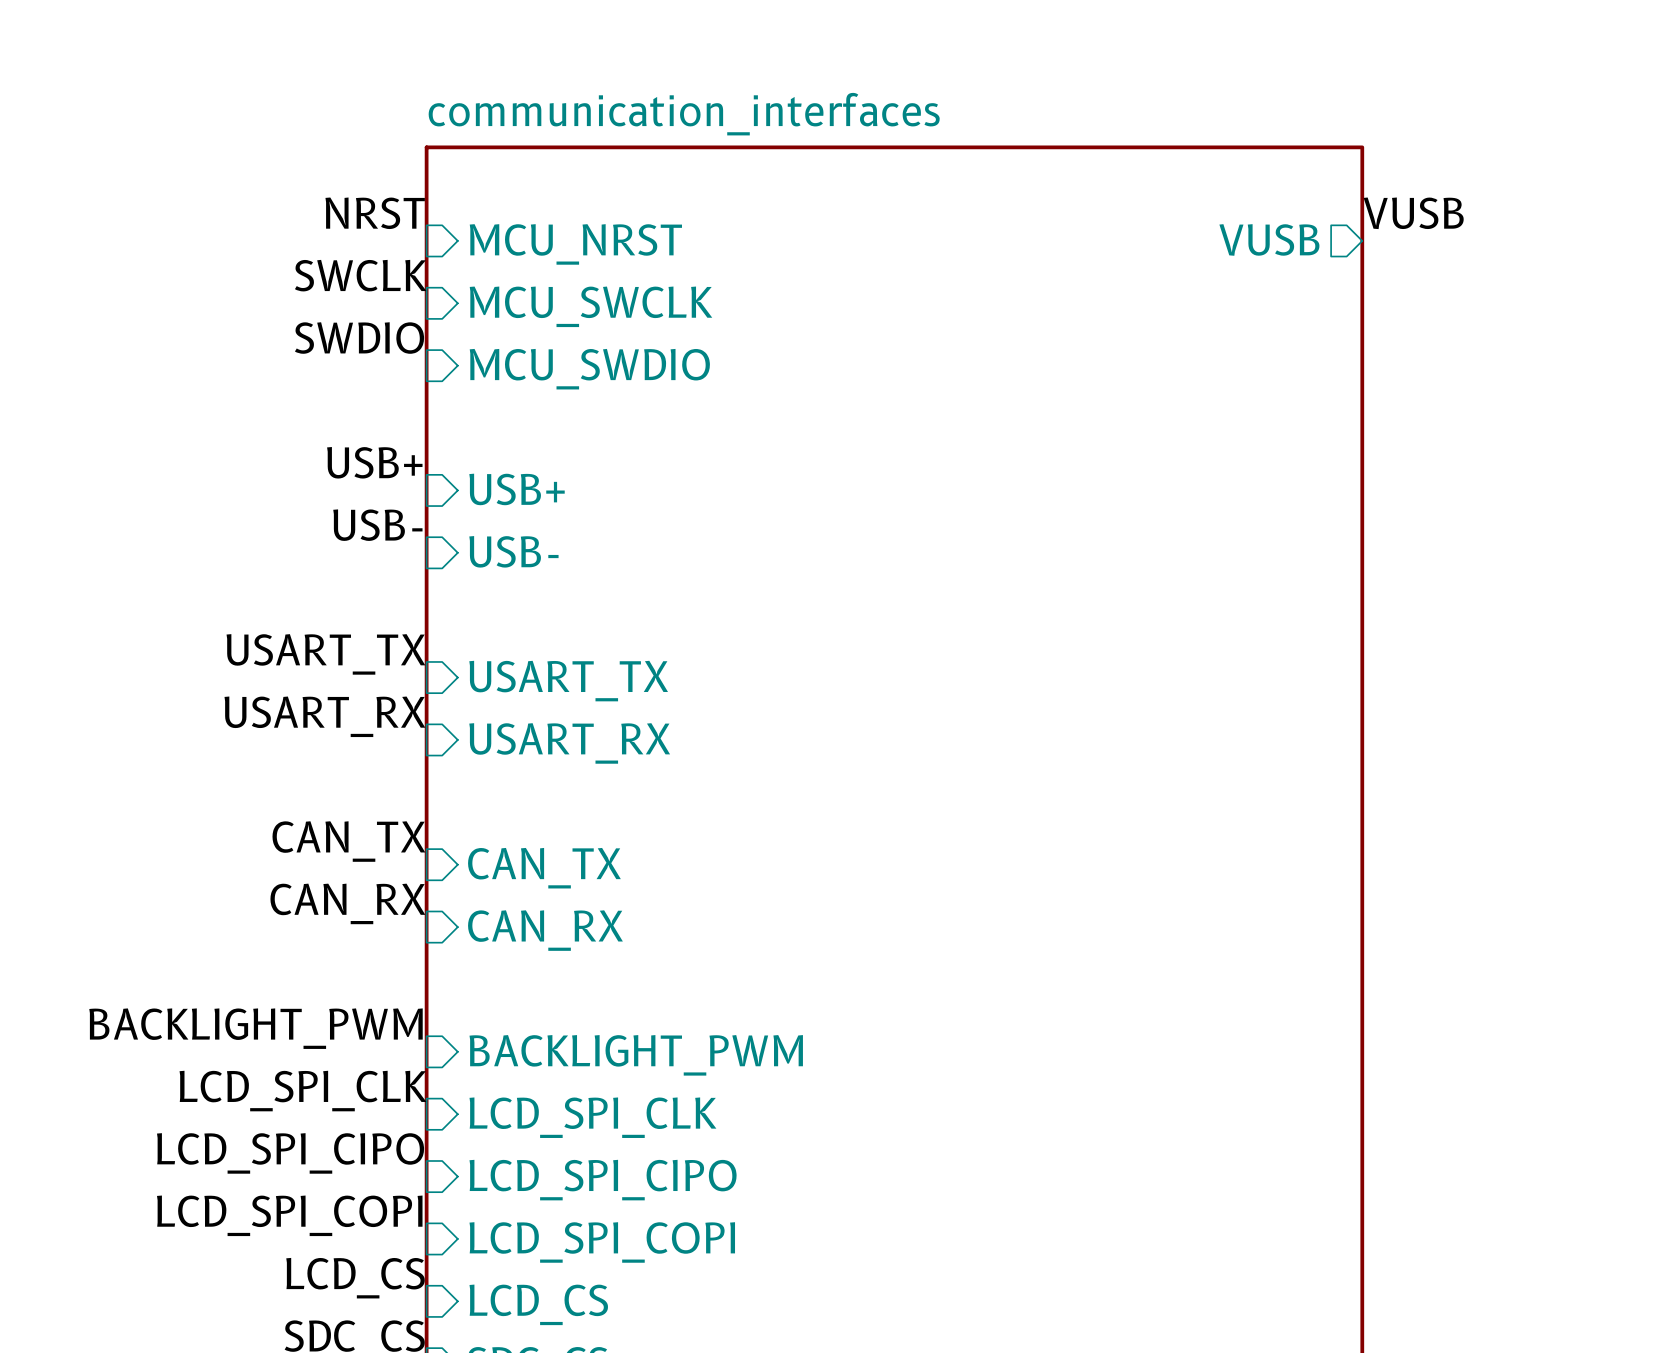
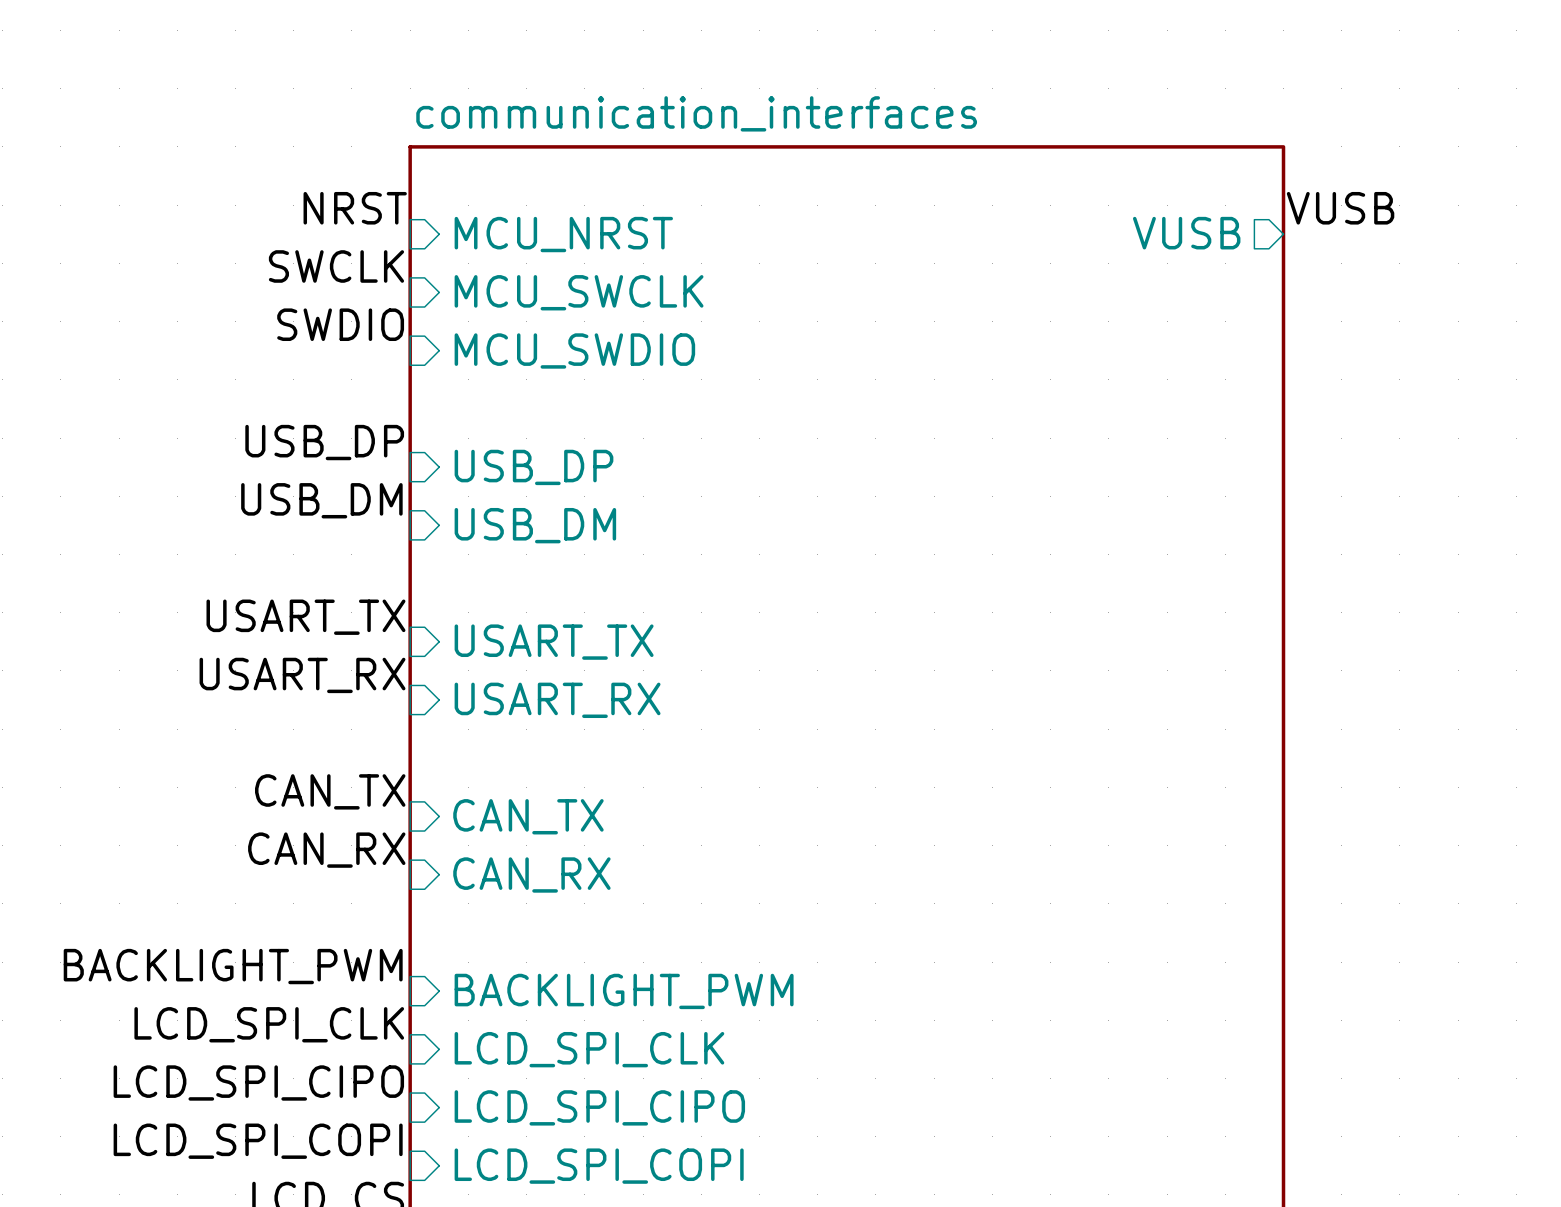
label: USB+ (374, 462) -> USB_DP (324, 442)
sheet pin: USB+ (517, 489) -> USB_DP (533, 467)
label: USB- (377, 525) -> USB_DM (321, 500)
sheet pin: USB- (513, 551) -> USB_DM (535, 525)

